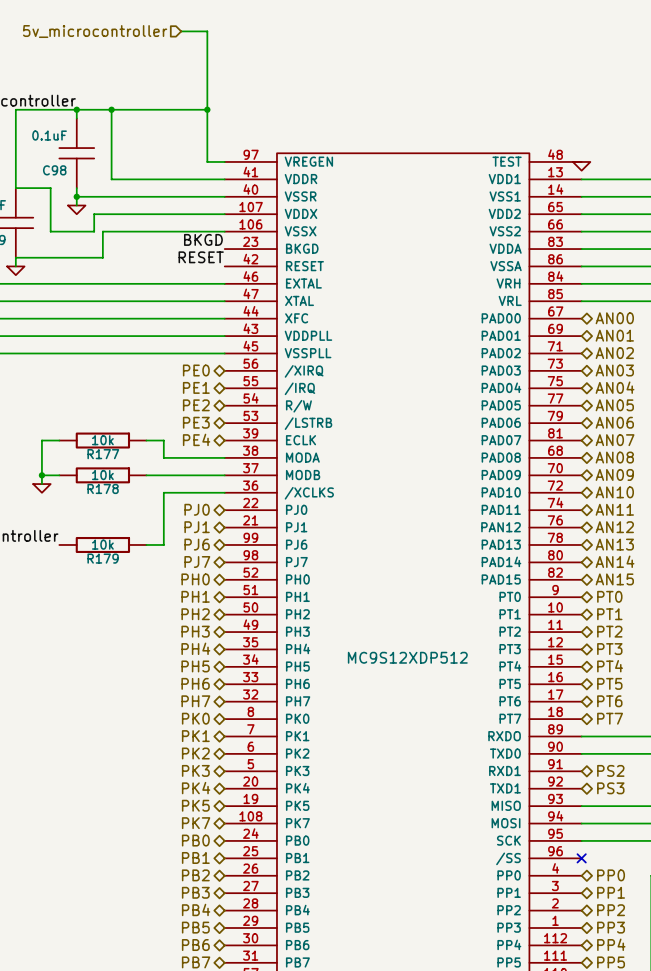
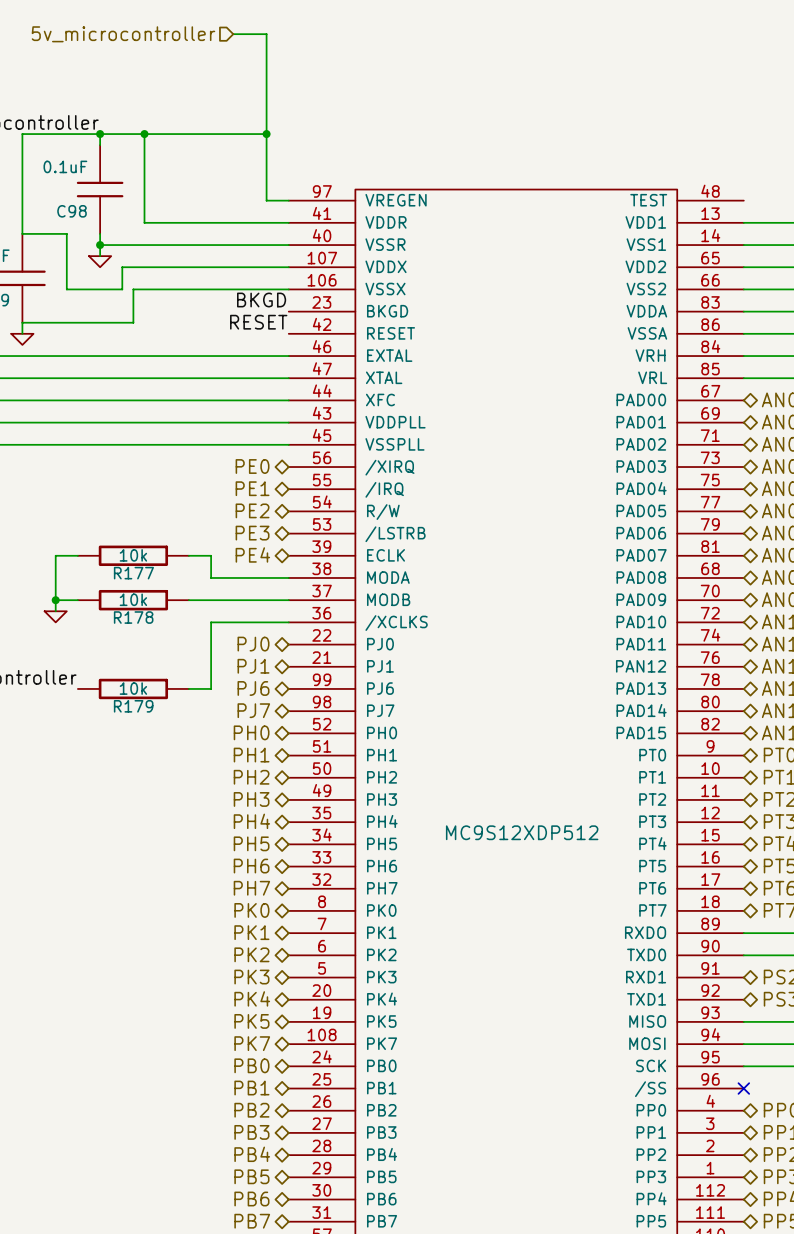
power symbol: (581, 166) -> none

